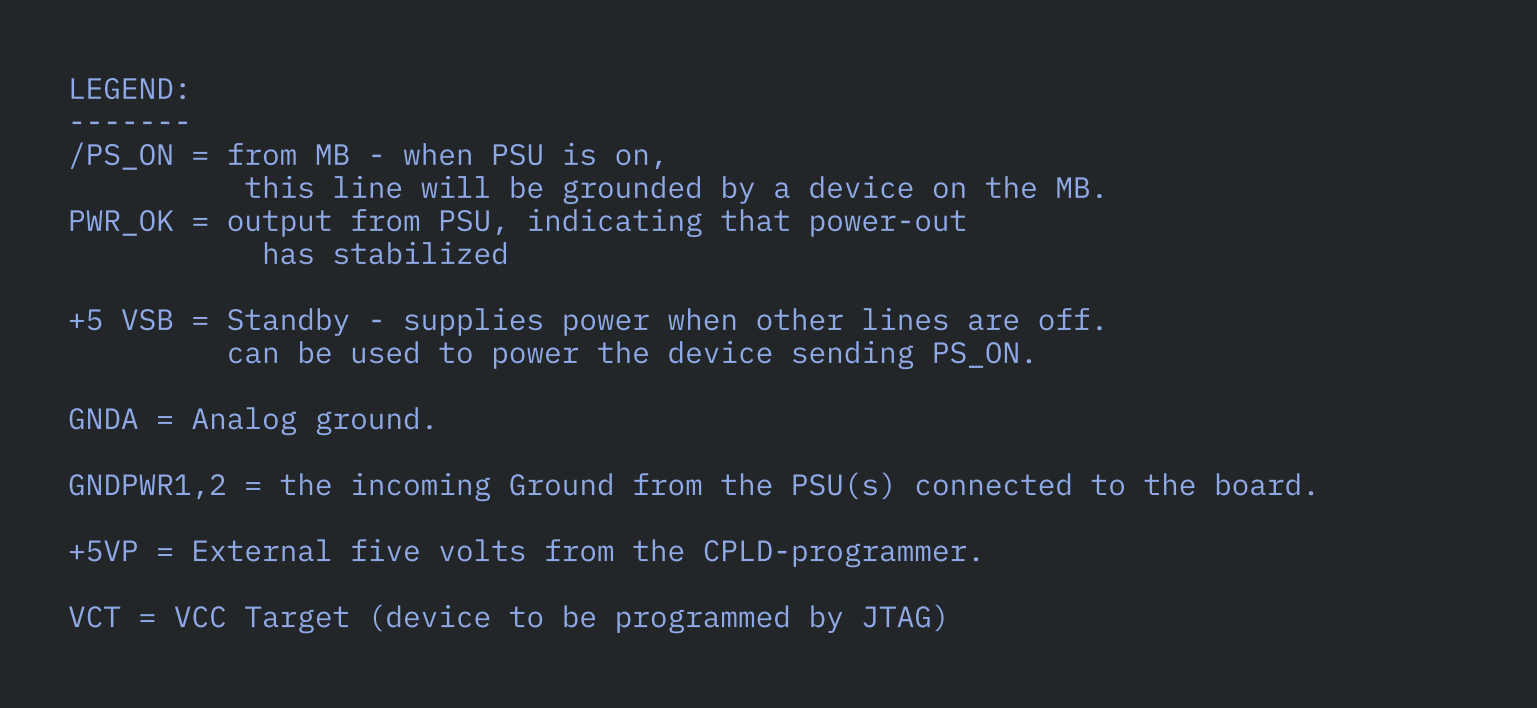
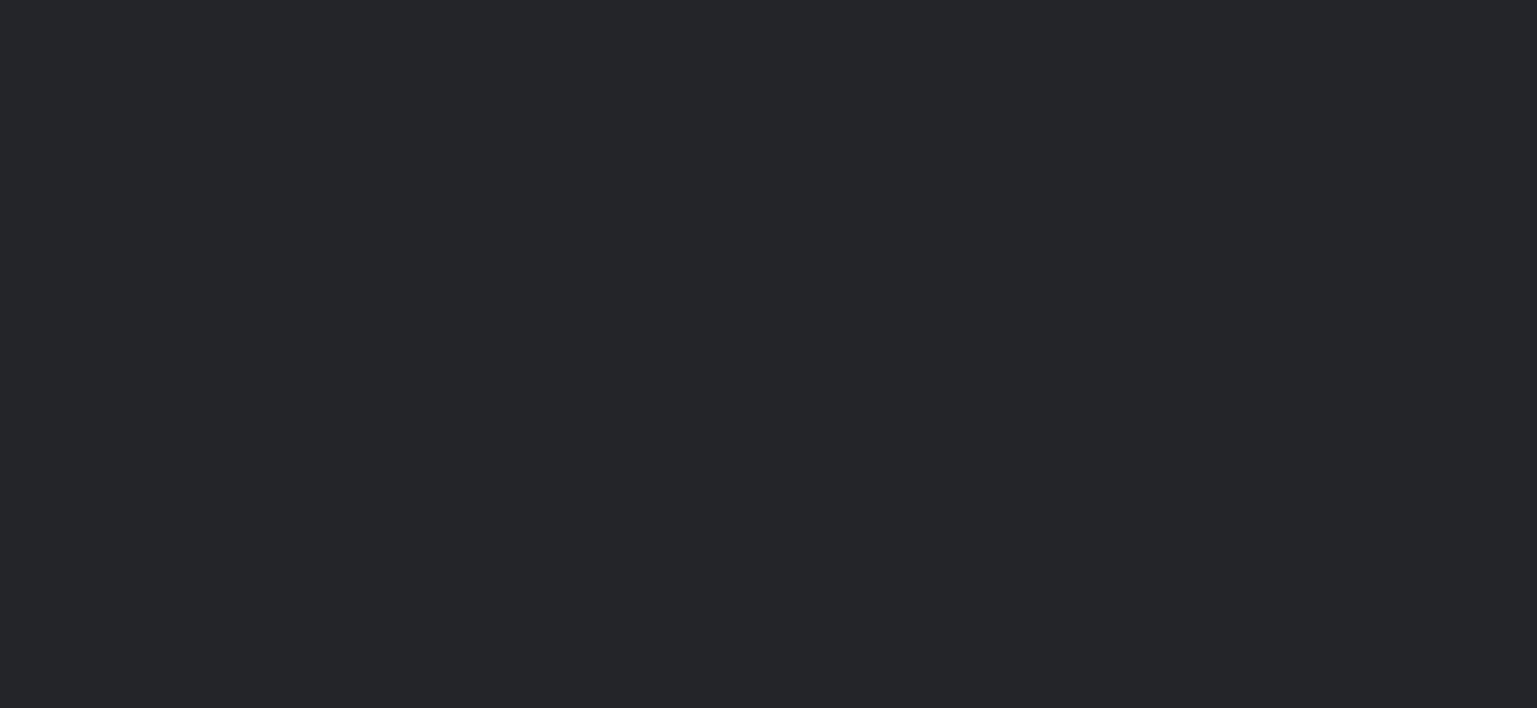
text: LEGEND: (128, 88) -> none
text: ------- (129, 122) -> none
text: /PS_ON = from MB - when PSU is on, (365, 156) -> none
text: this line will be grounded by a device on the MB. (673, 189) -> none
text: PWR_OK = output from PSU, indicating that power-out (517, 222) -> none
text: has stabilized (385, 253) -> none
text: +5 VSB = Standby - supplies power when other lines are off. (585, 321) -> none
text: can be used to power the device sending PS_ON. (630, 355) -> none
text: GNDA = Analog ground. (250, 421) -> none
text: GNDPWR1,2 = the incoming Ground from the PSU(s) connected to the board. (691, 486) -> none
text: +5VP = External five volts from the CPLD-programmer. (524, 553) -> none
text: VCT = VCC Target (device to be programmed by JTAG) (506, 619) -> none

